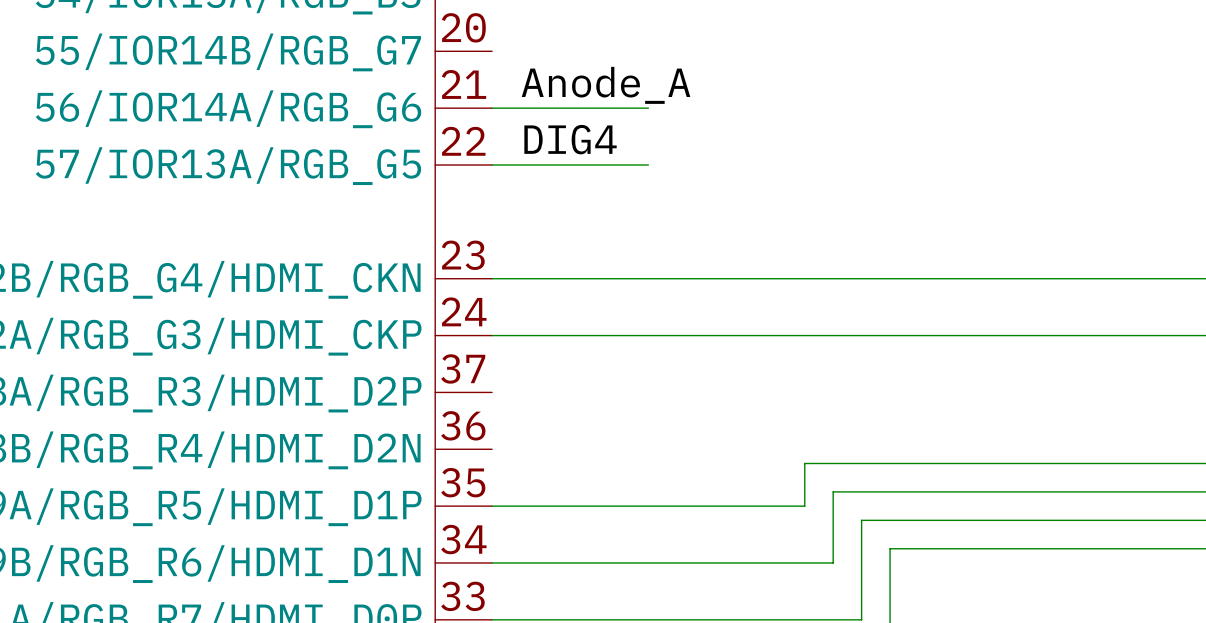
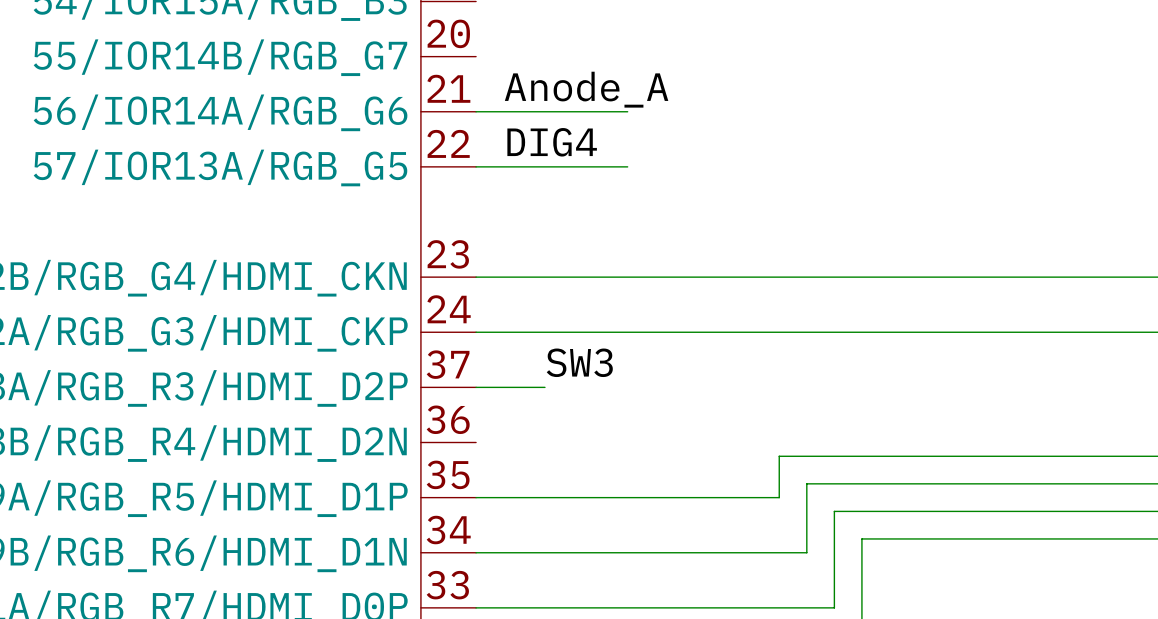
label: none -> SW3 (579, 362)
wire: none -> (476, 387) (544, 387)

